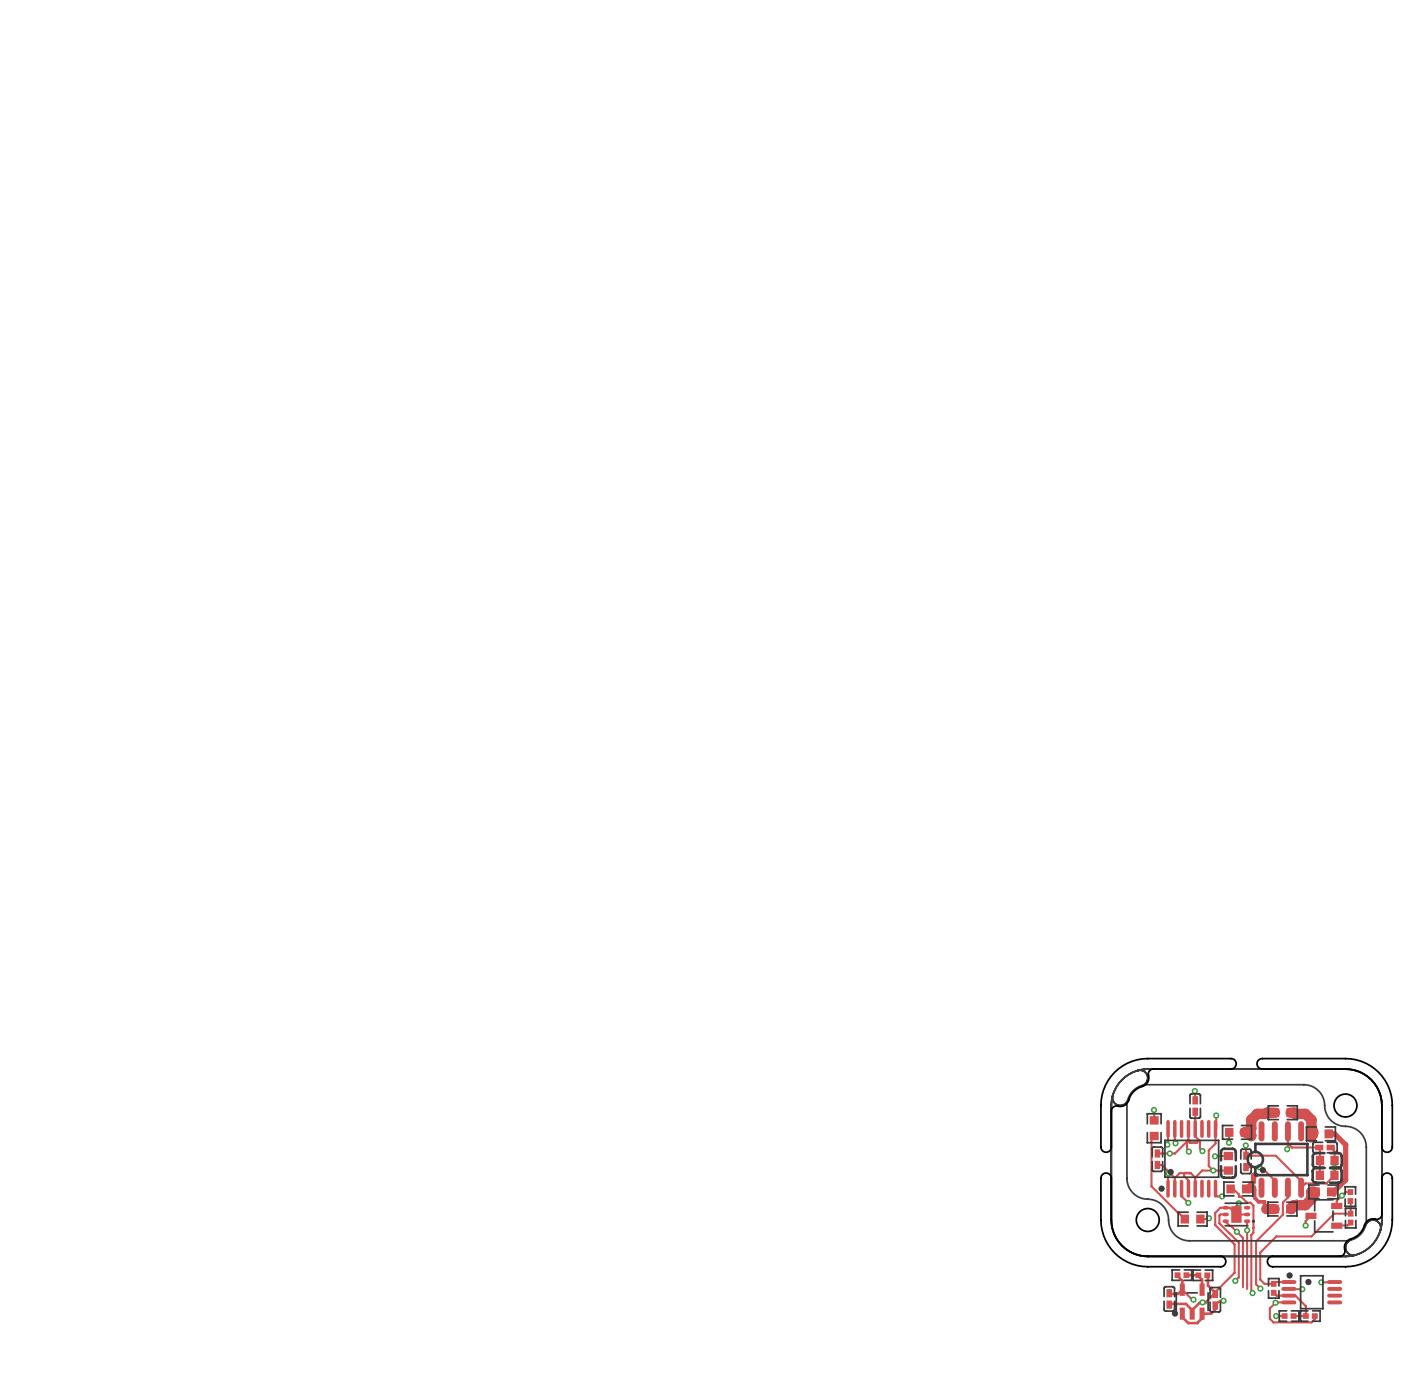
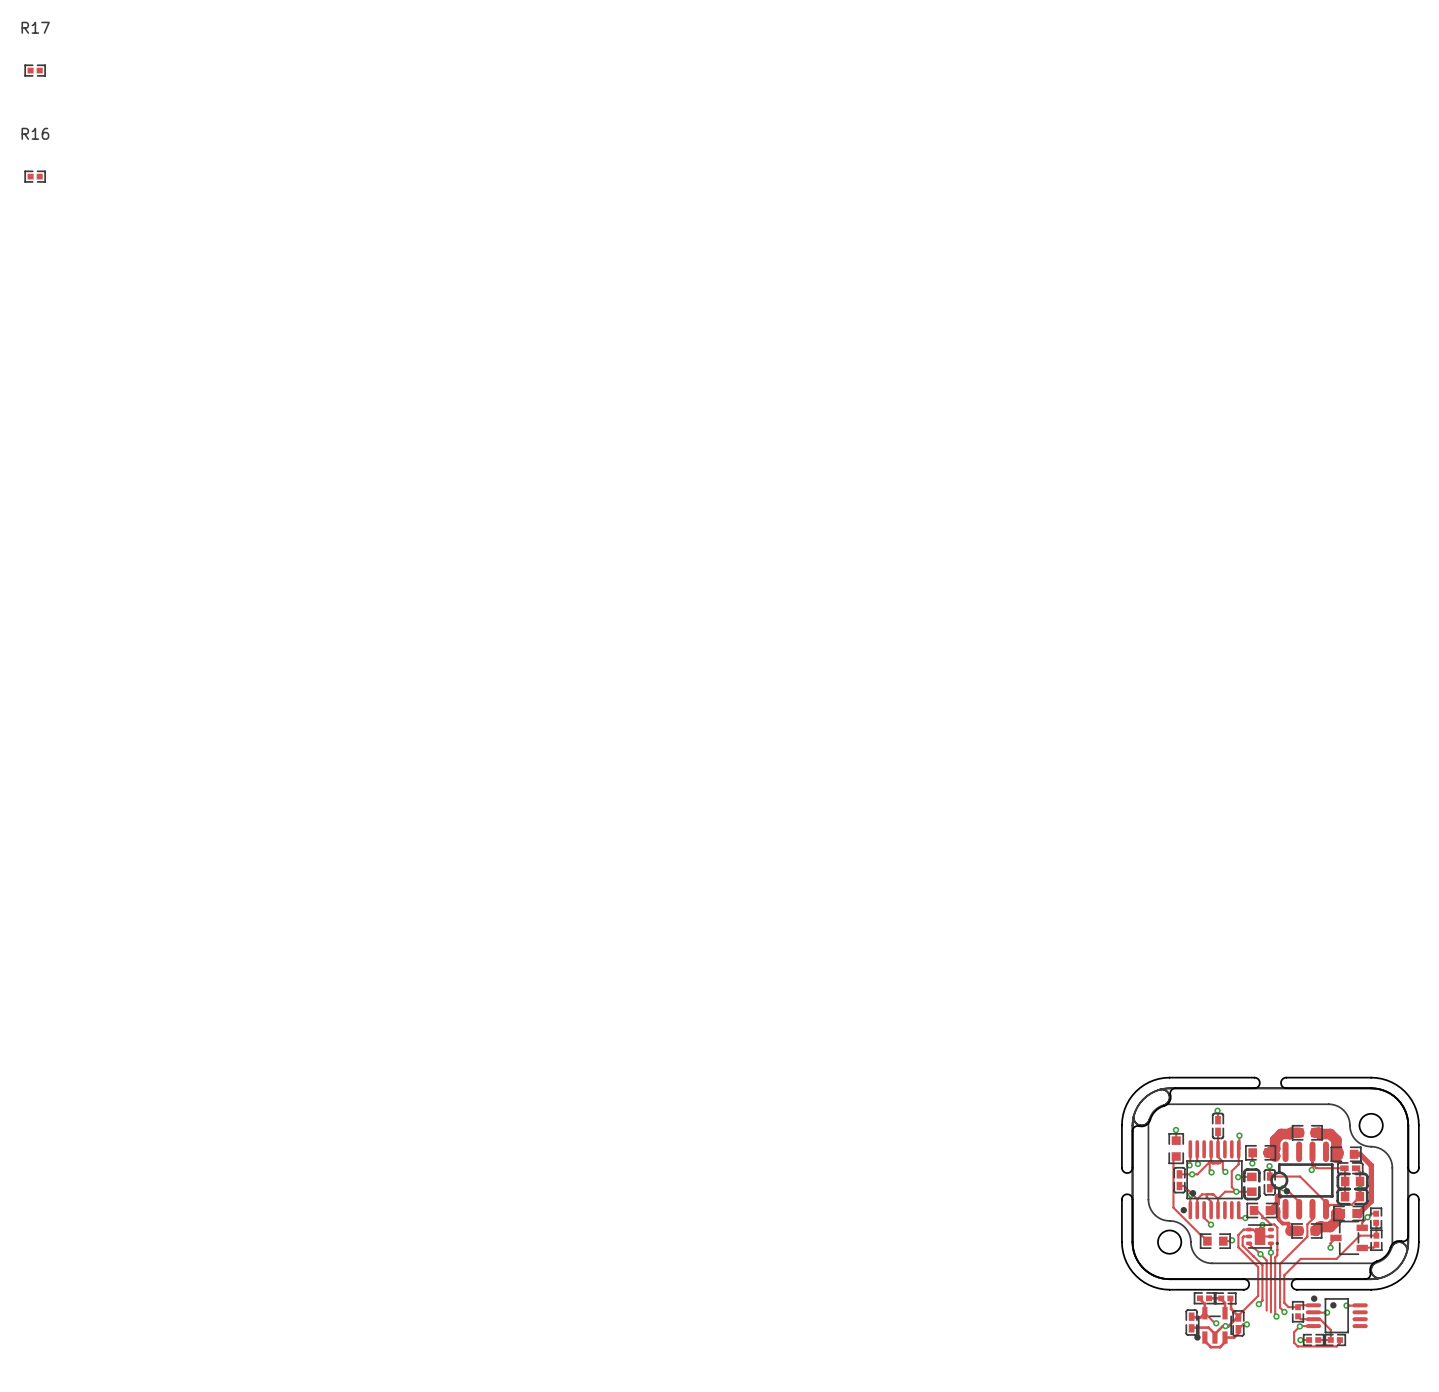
R17: none -> (35, 70)
R16: none -> (35, 176)

